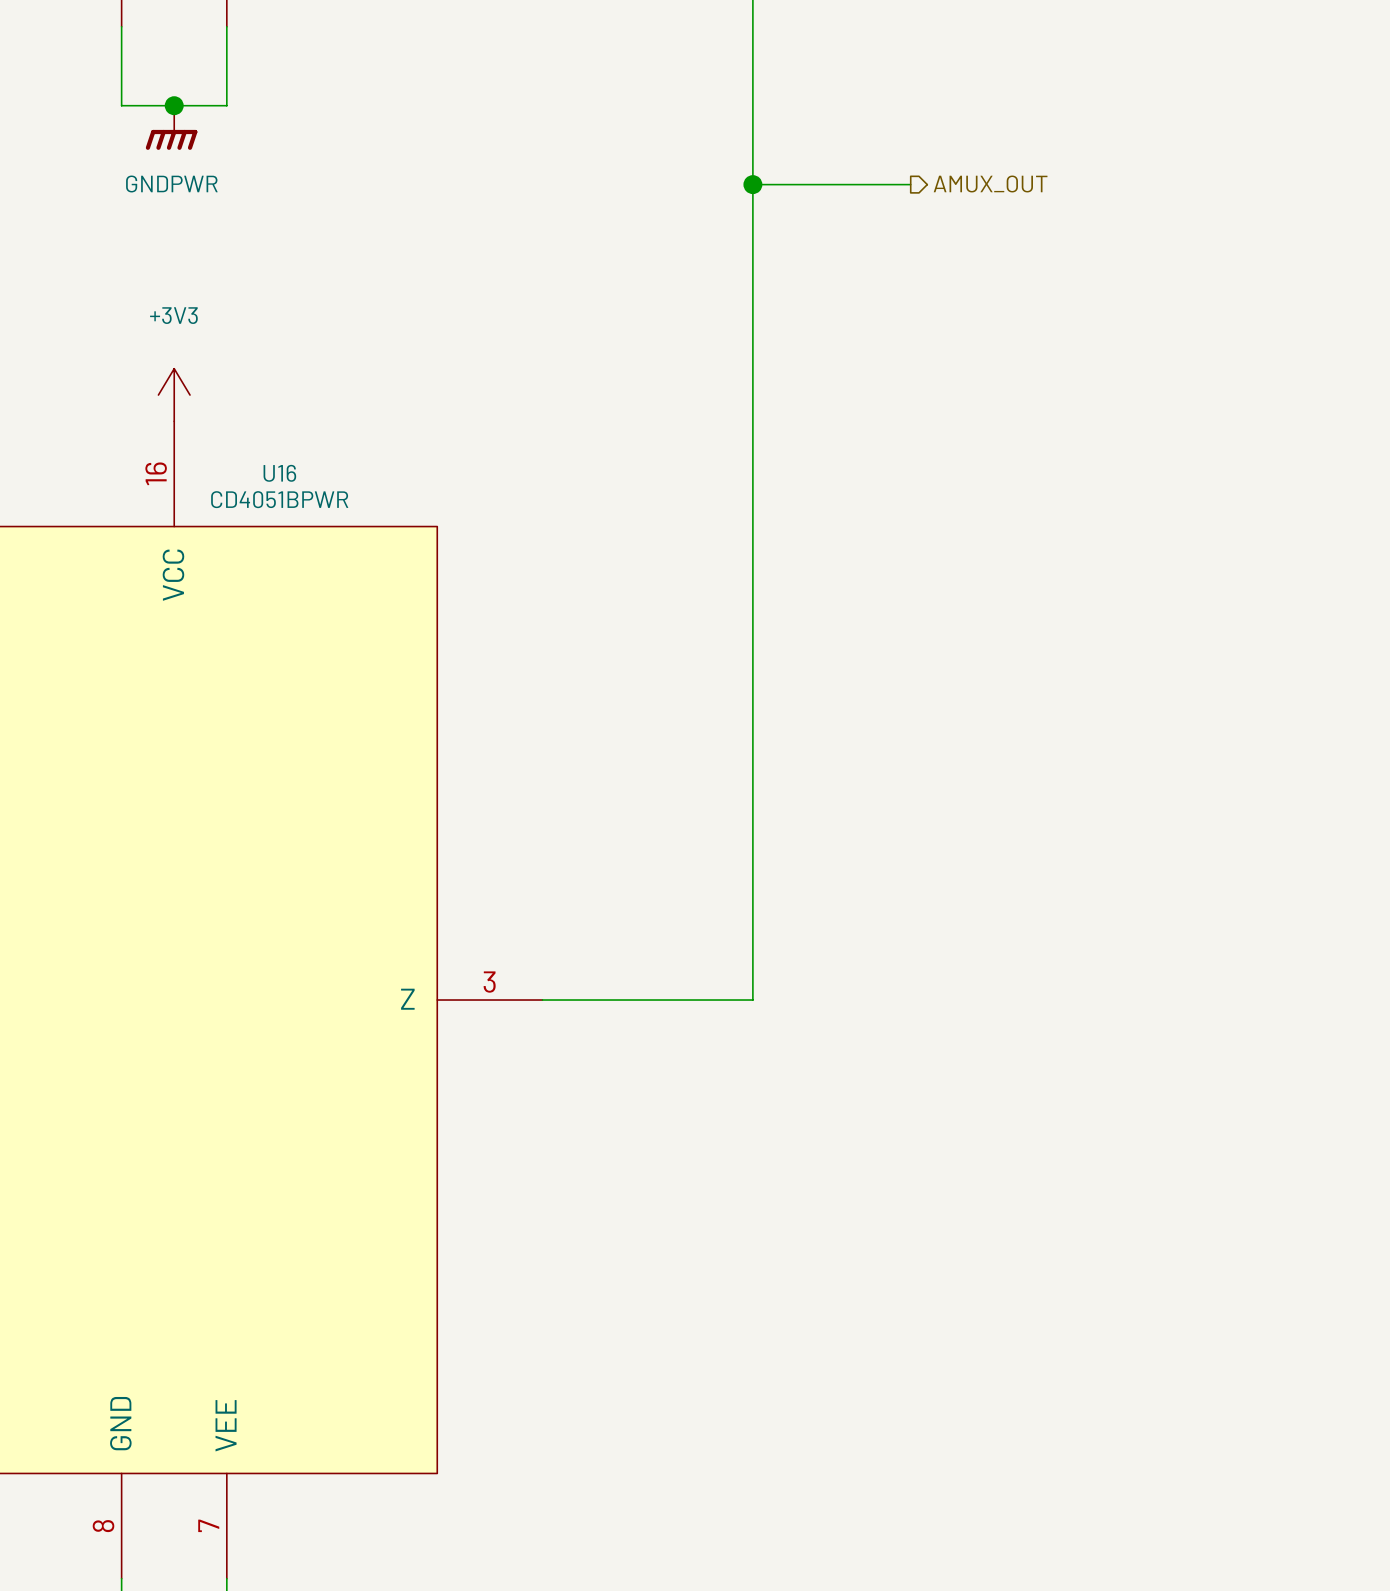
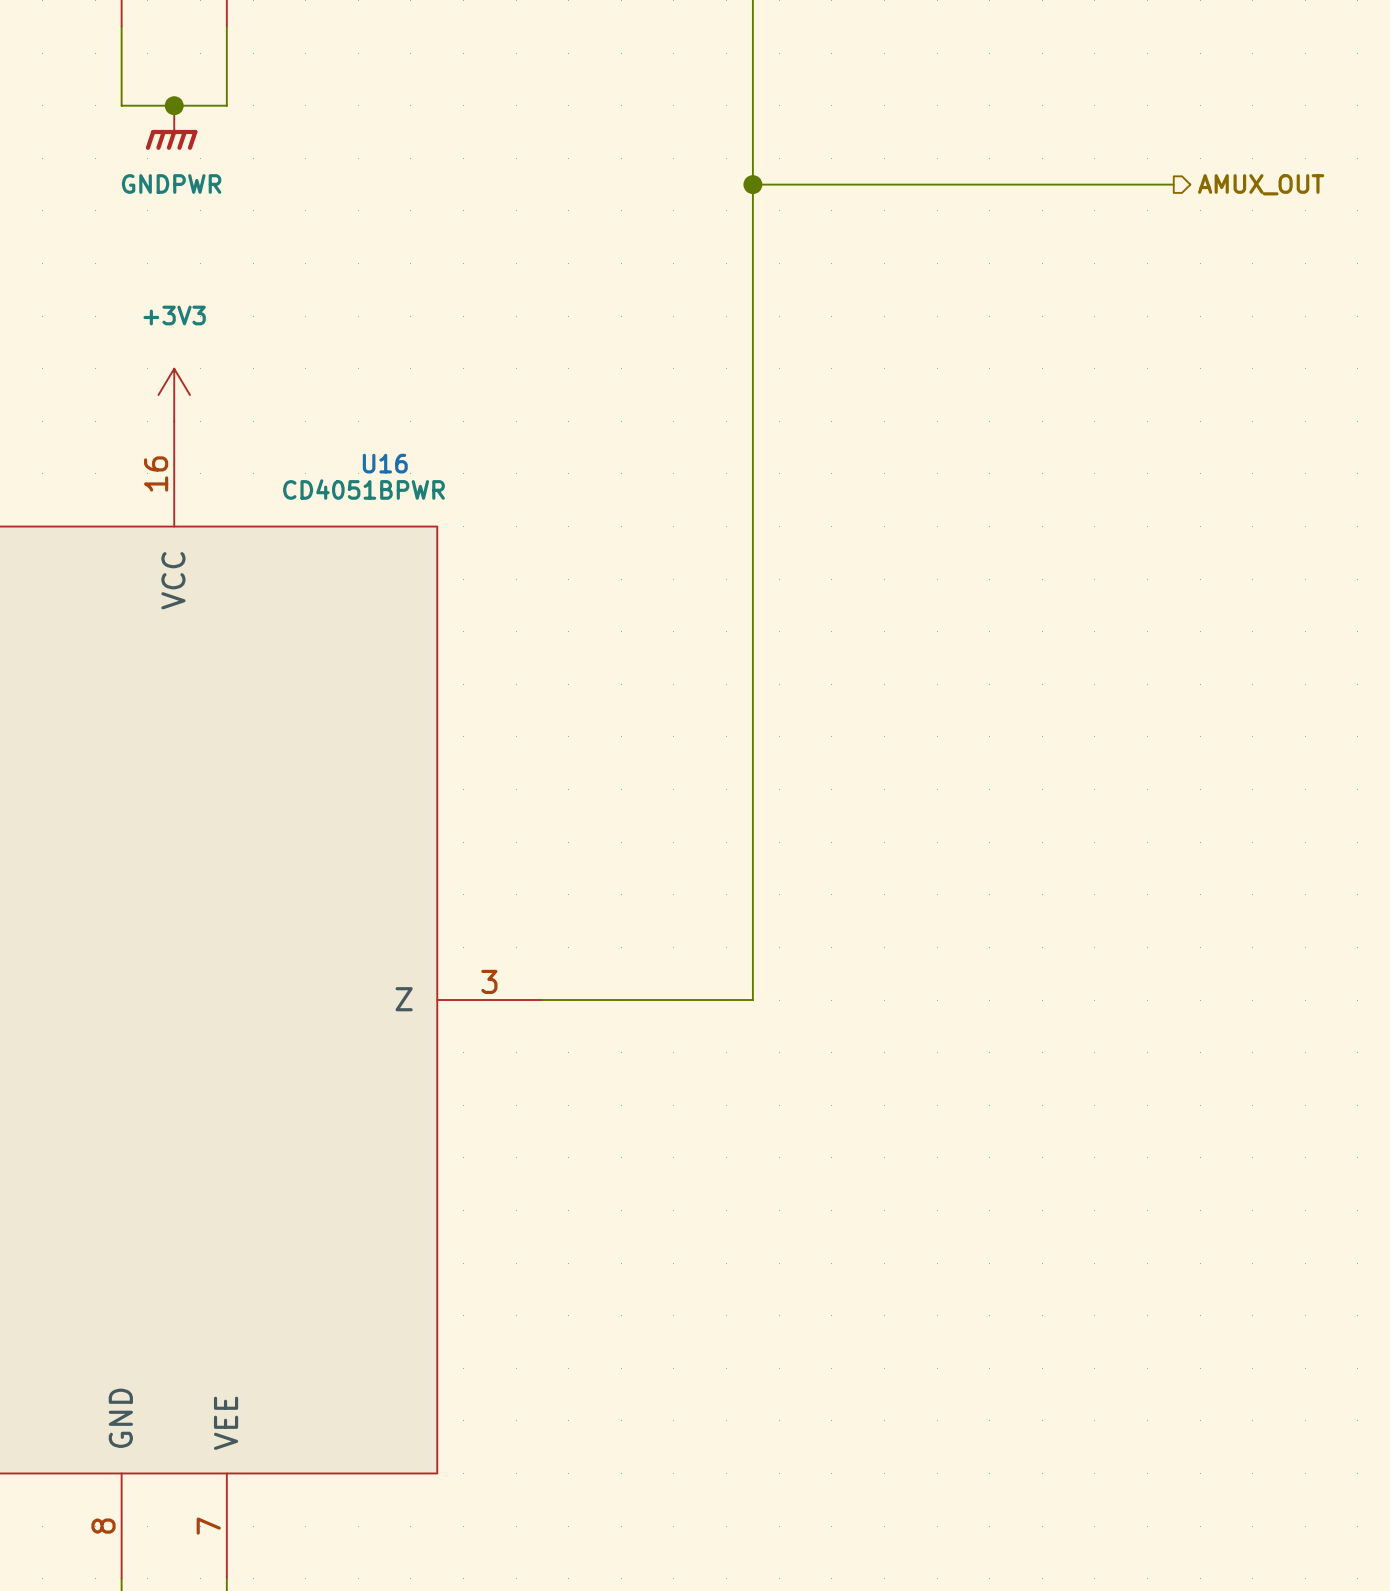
hierarchical label position: AMUX_OUT (990, 183) -> AMUX_OUT (1261, 184)
wire: none -> (910, 184) (1173, 184)
U16 name position: U16 (279, 473) -> U16 (385, 463)
U16 value position: CD4051BPWR (279, 499) -> CD4051BPWR (363, 489)

